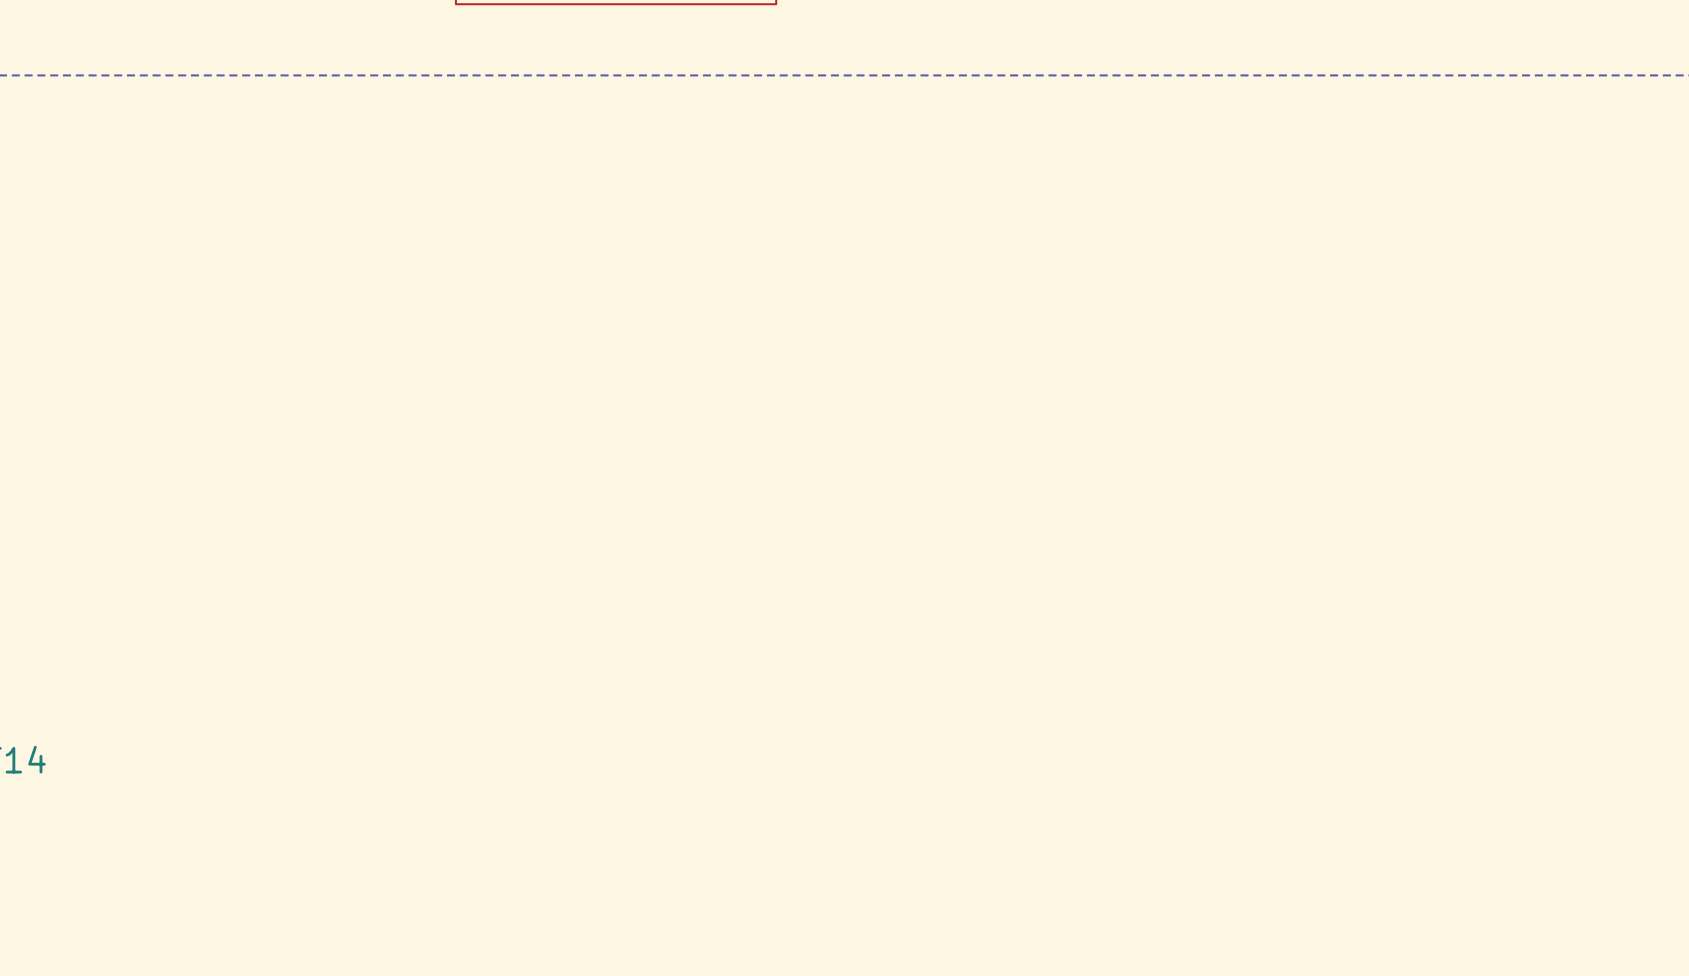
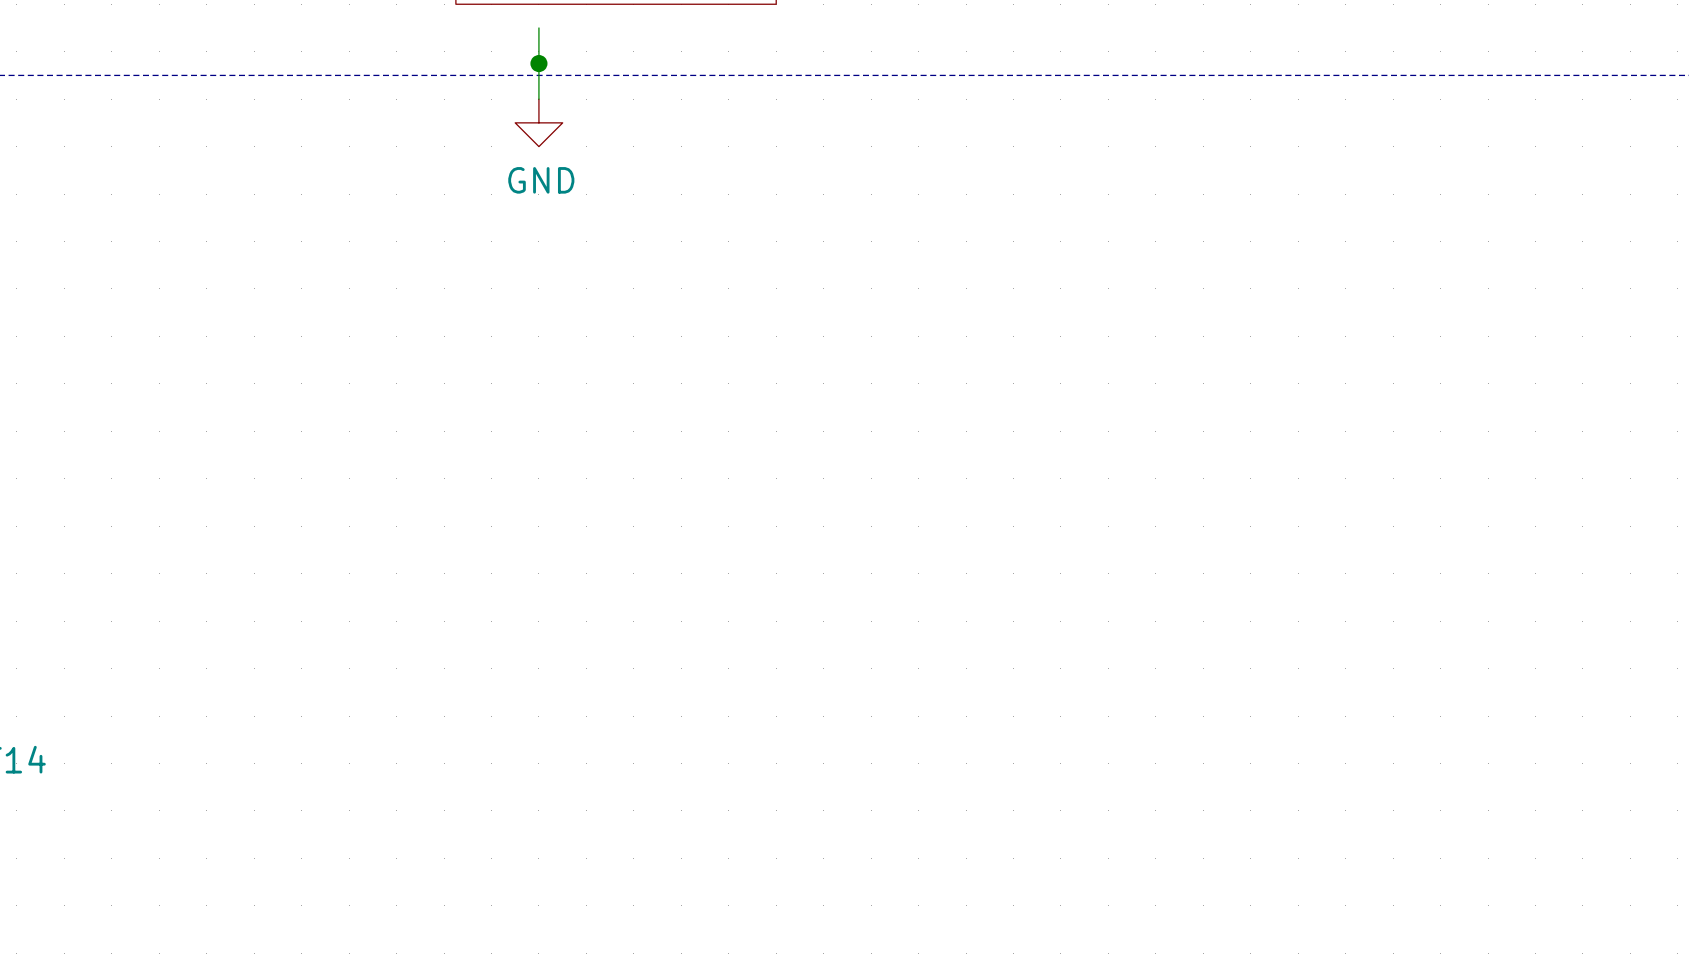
wire: none -> (538, 27) (538, 99)
junction: none -> (538, 63)
power symbol: none -> GND (538, 122)

